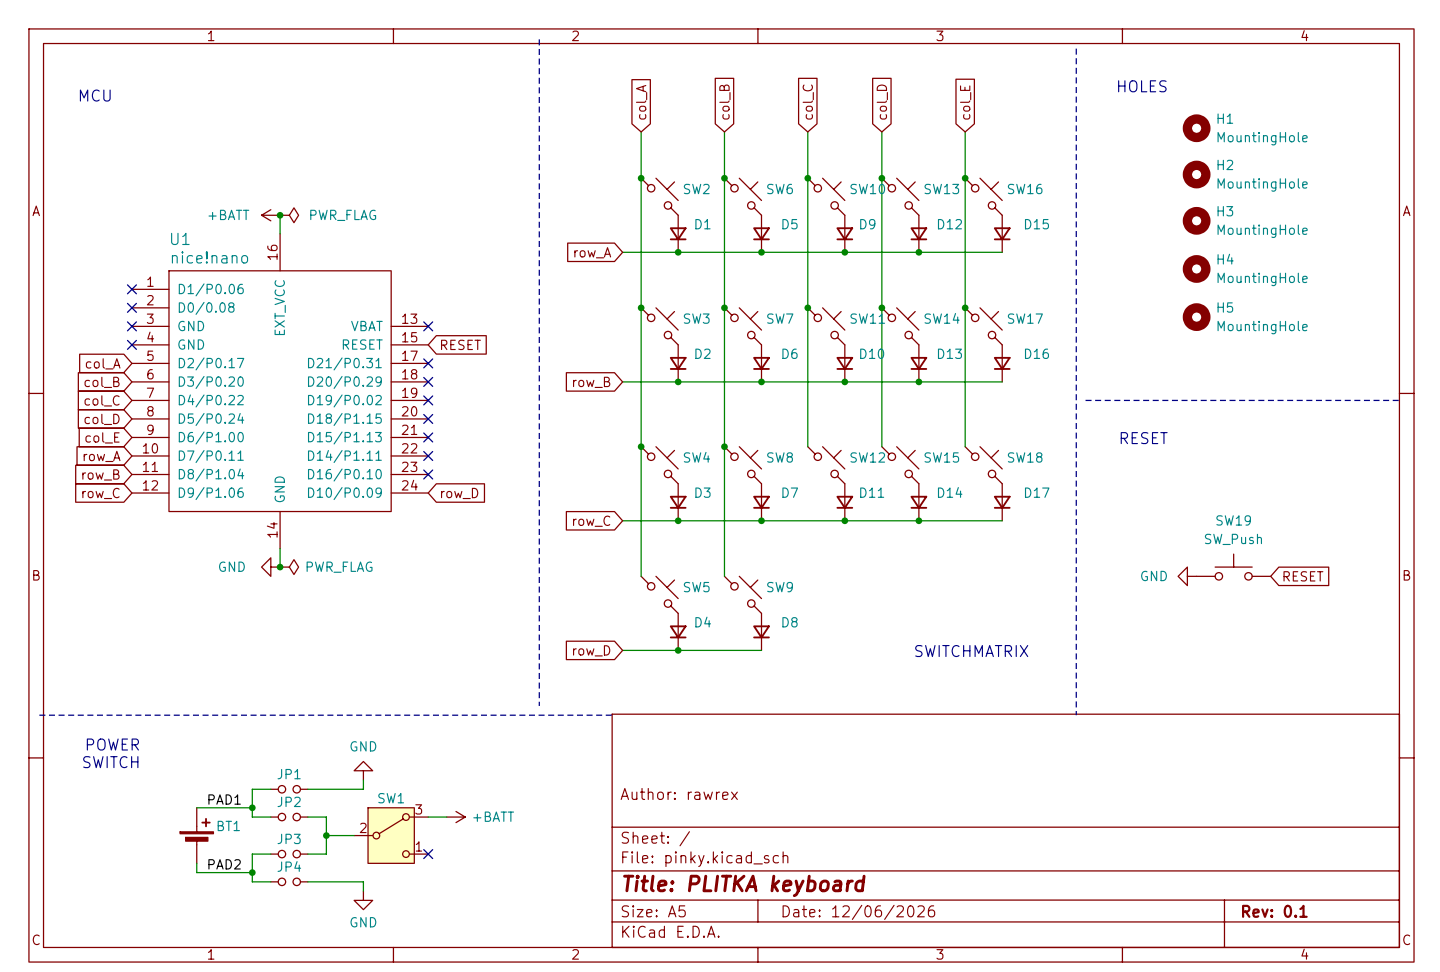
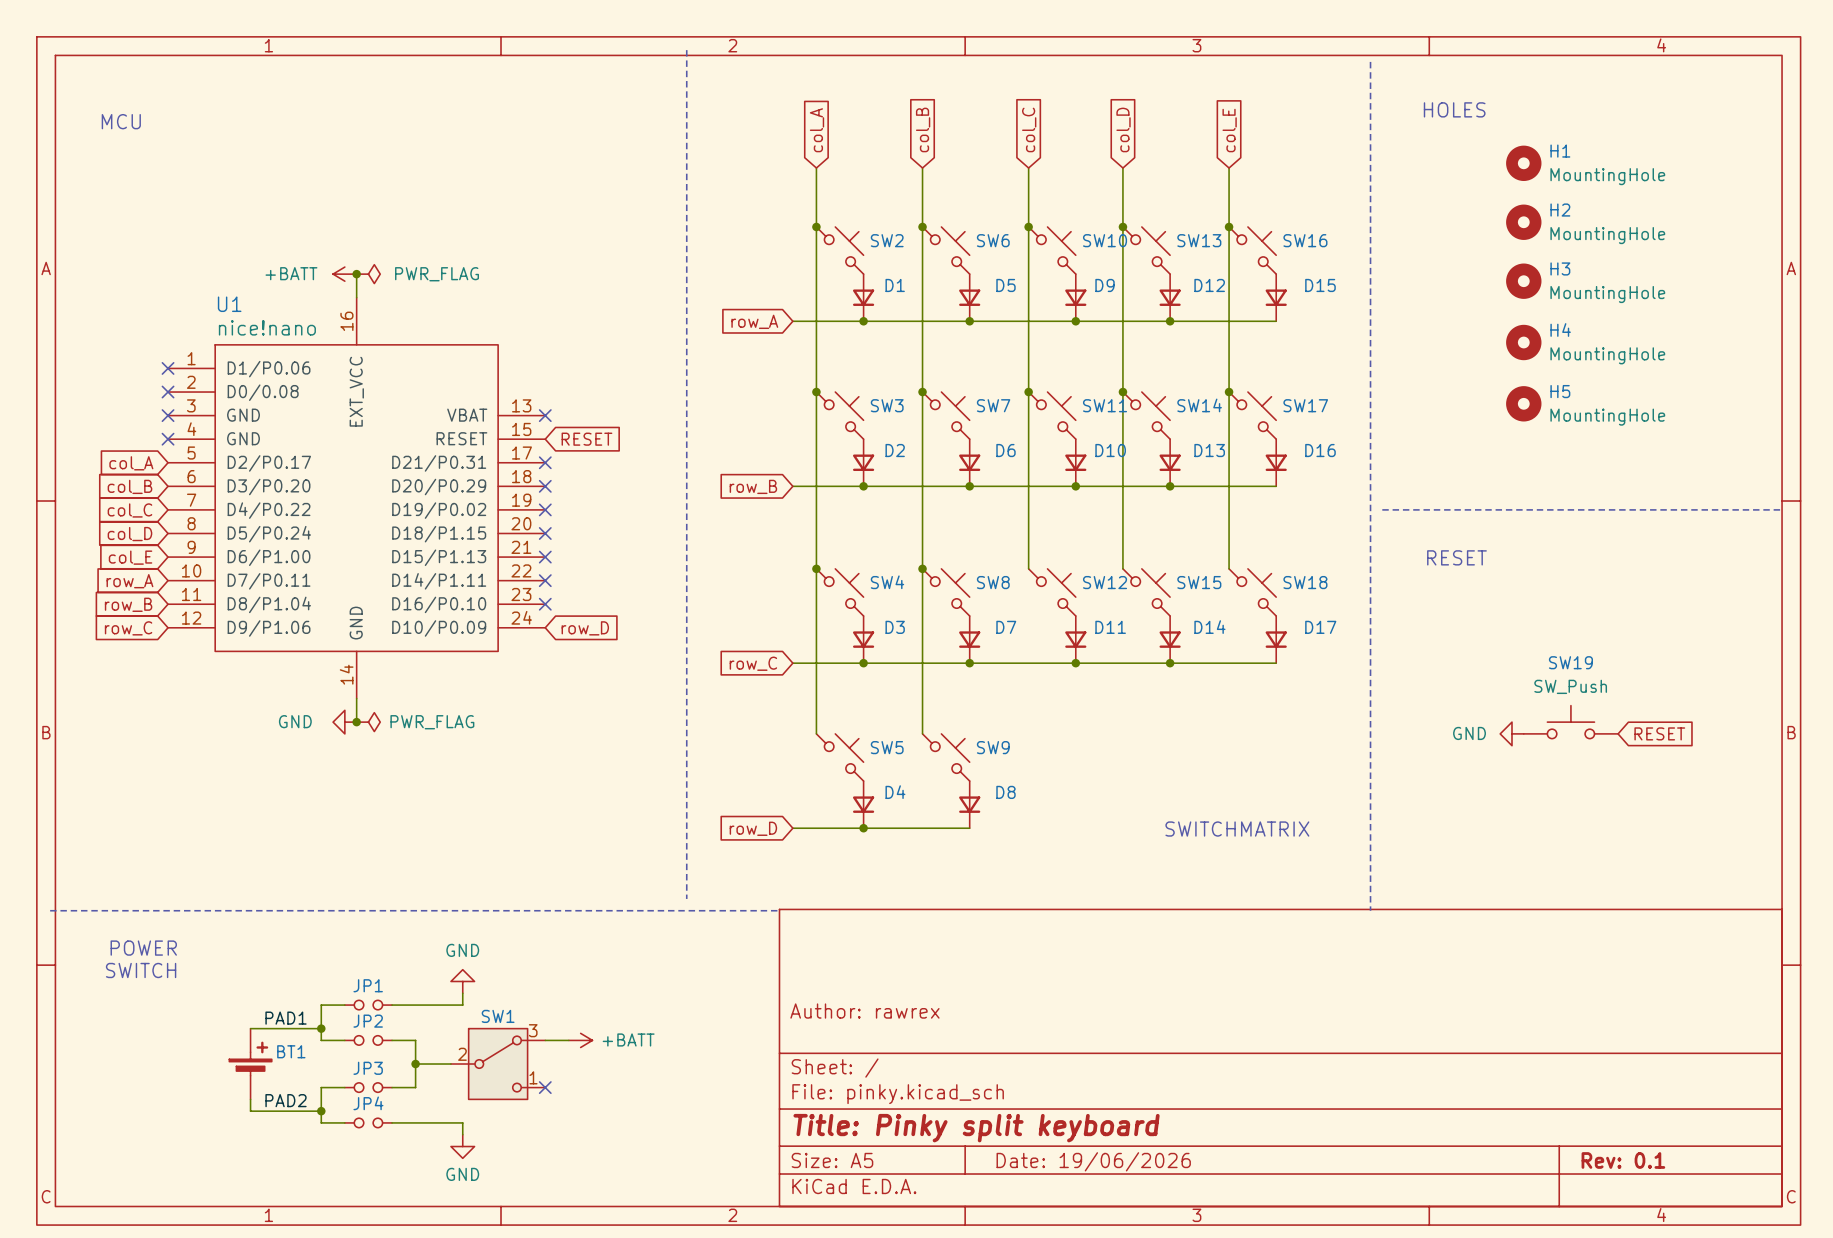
title block: Title: PLITKA keyboard (744, 885) -> Title: Pinky split keyboard (976, 1128)
title block: Date: 12/06/2026 (858, 912) -> Date: 19/06/2026 (1093, 1161)

